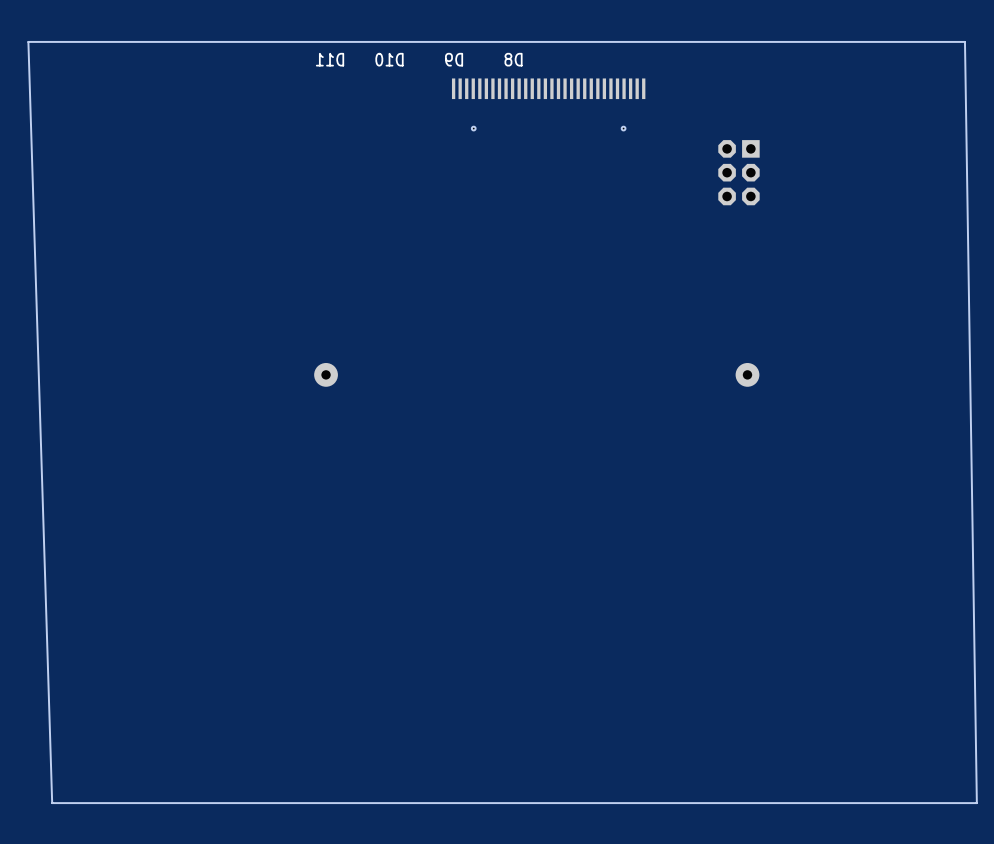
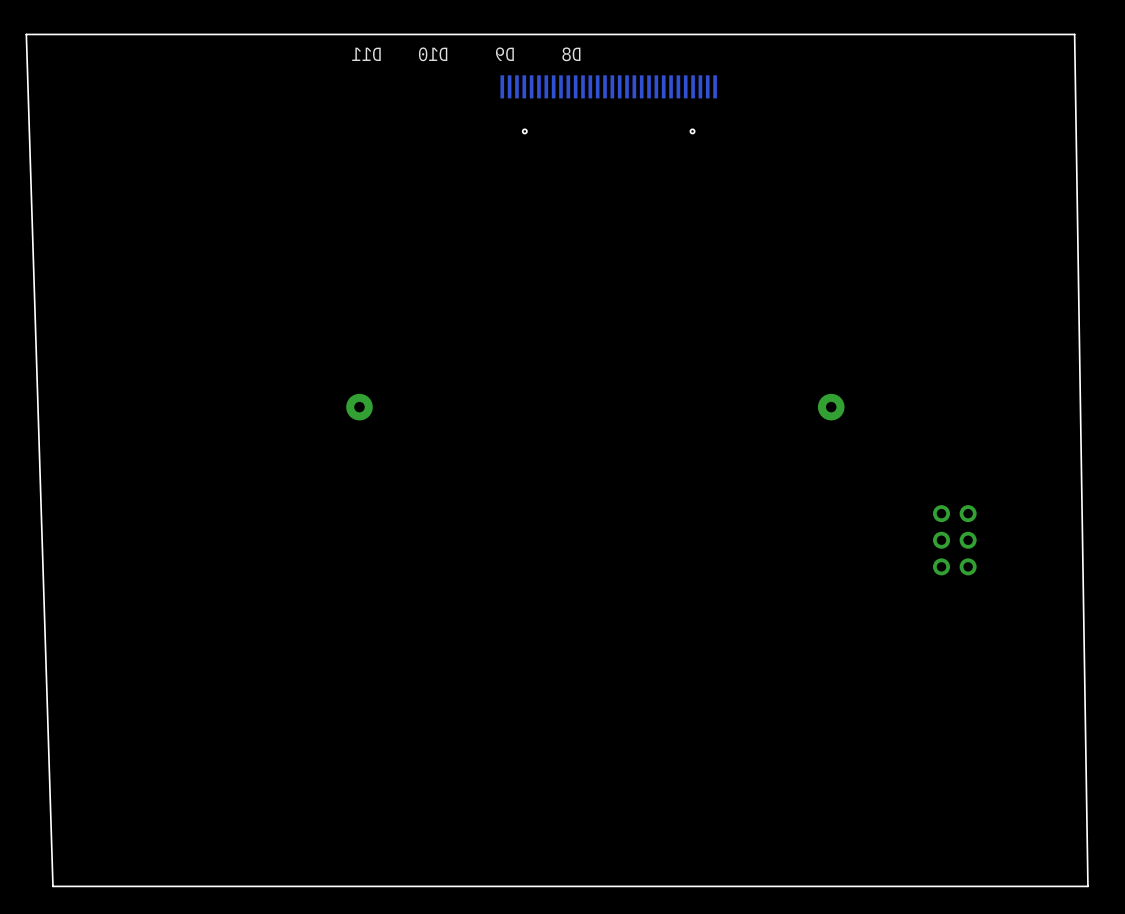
part: (738, 172) -> none
part: none -> (954, 540)

